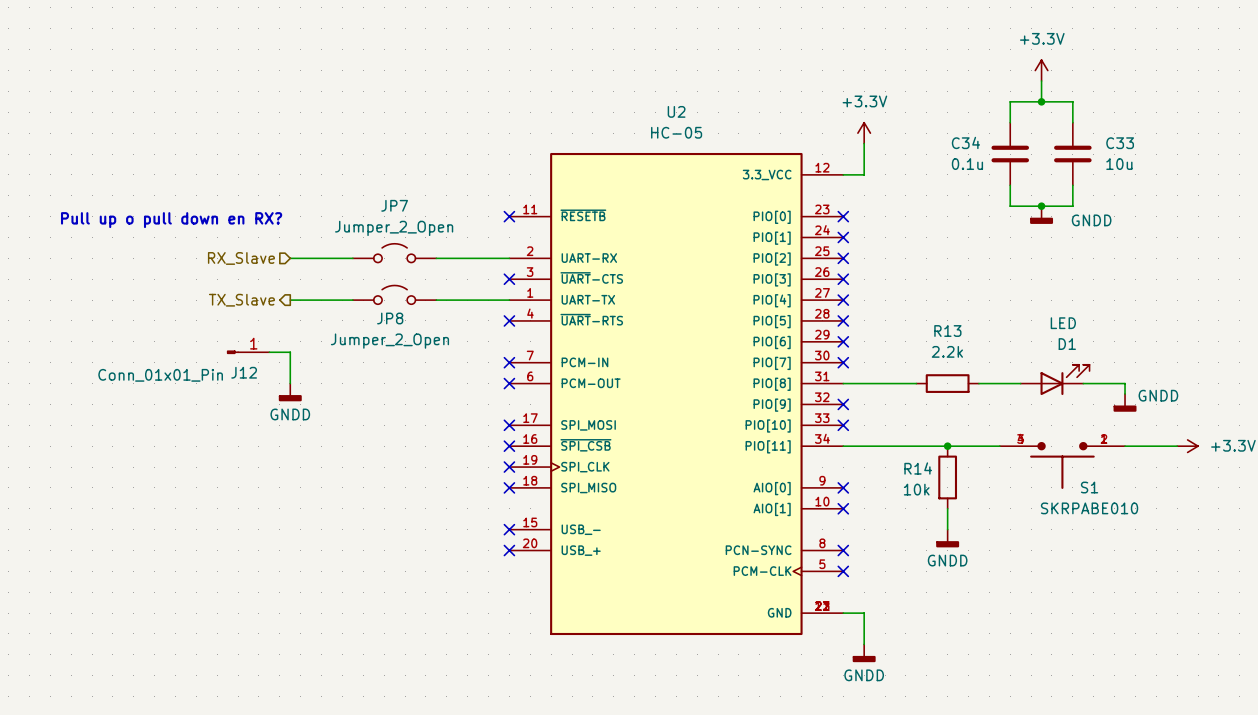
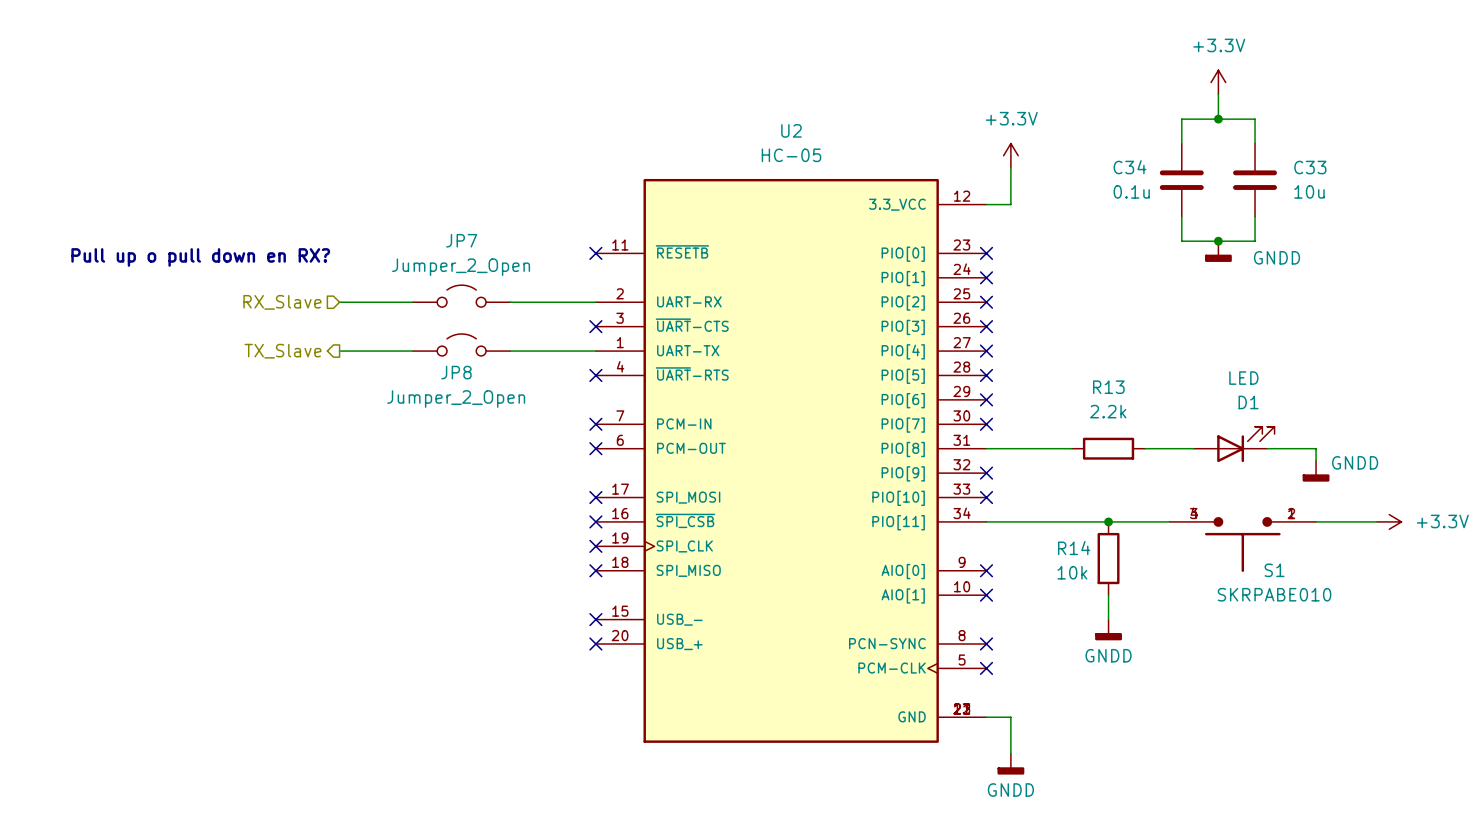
J12: Conn_01x01_Pin (248, 352) -> none
wire: (269, 352) (290, 352) (290, 383) -> none
power symbol: GNDD (290, 392) -> none

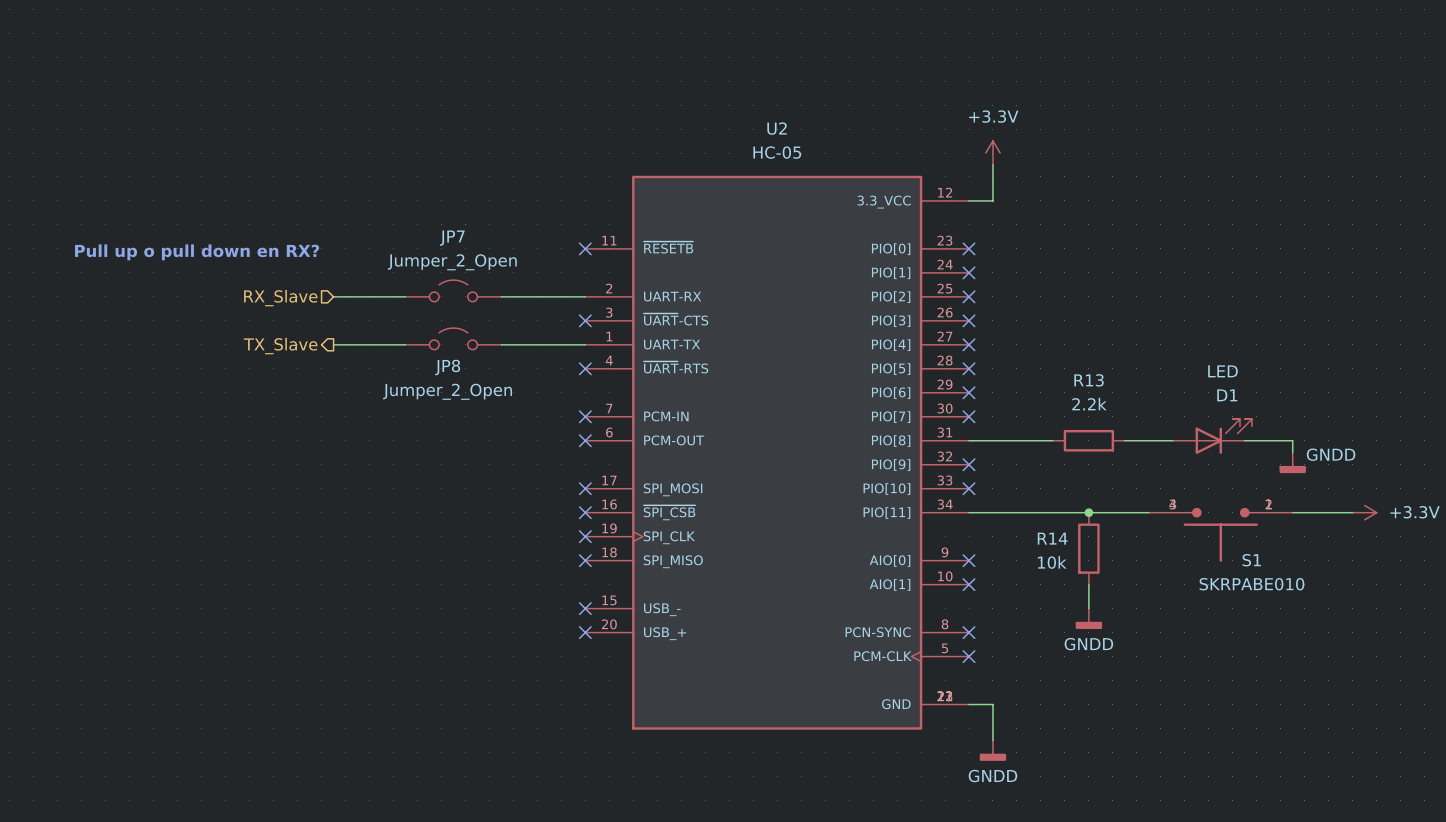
power symbol: +3.3V (1218, 82) -> none
wire: (1218, 94) (1218, 119) -> none
junction: (1218, 119) -> none
wire: (1181, 143) (1181, 119) (1255, 119) (1255, 143) -> none
C34: 0.1u (1181, 180) -> none
C33: 10u (1255, 180) -> none
wire: (1181, 216) (1181, 241) (1255, 241) (1255, 216) -> none
junction: (1218, 241) -> none
power symbol: GNDD (1218, 251) -> none

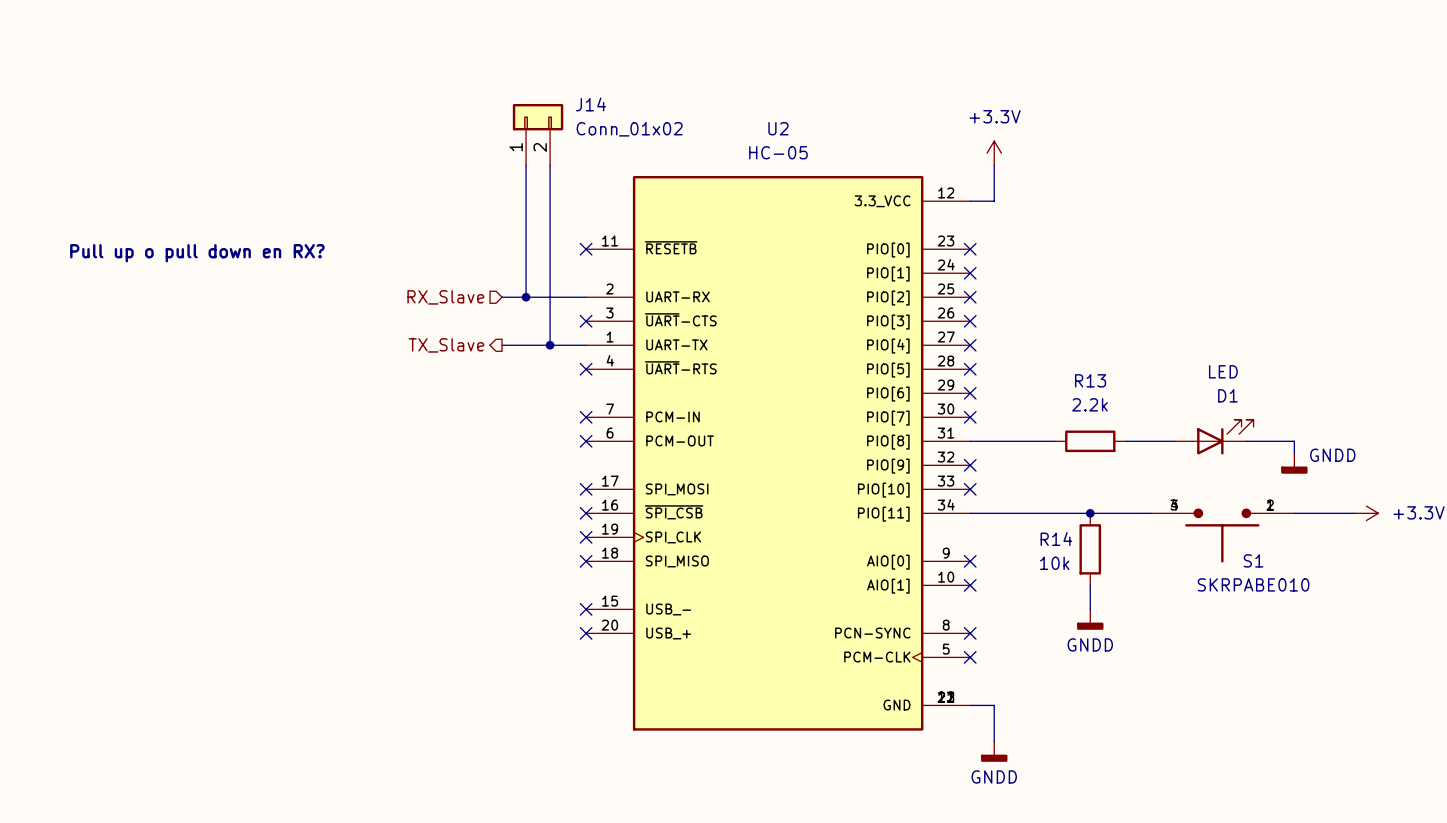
J14: none -> Conn_01x02 (538, 134)
wire: none -> (526, 165) (526, 297)
wire: none -> (550, 165) (550, 345)
JP7: Jumper_2_Open (453, 290) -> none
wire: (333, 296) (405, 296) -> none
junction: none -> (526, 297)
hierarchical label position: RX_Slave (280, 298) -> RX_Slave (445, 297)
JP8: Jumper_2_Open (453, 338) -> none
wire: (333, 344) (405, 344) -> none
junction: none -> (550, 345)
hierarchical label position: TX_Slave (280, 346) -> TX_Slave (446, 345)

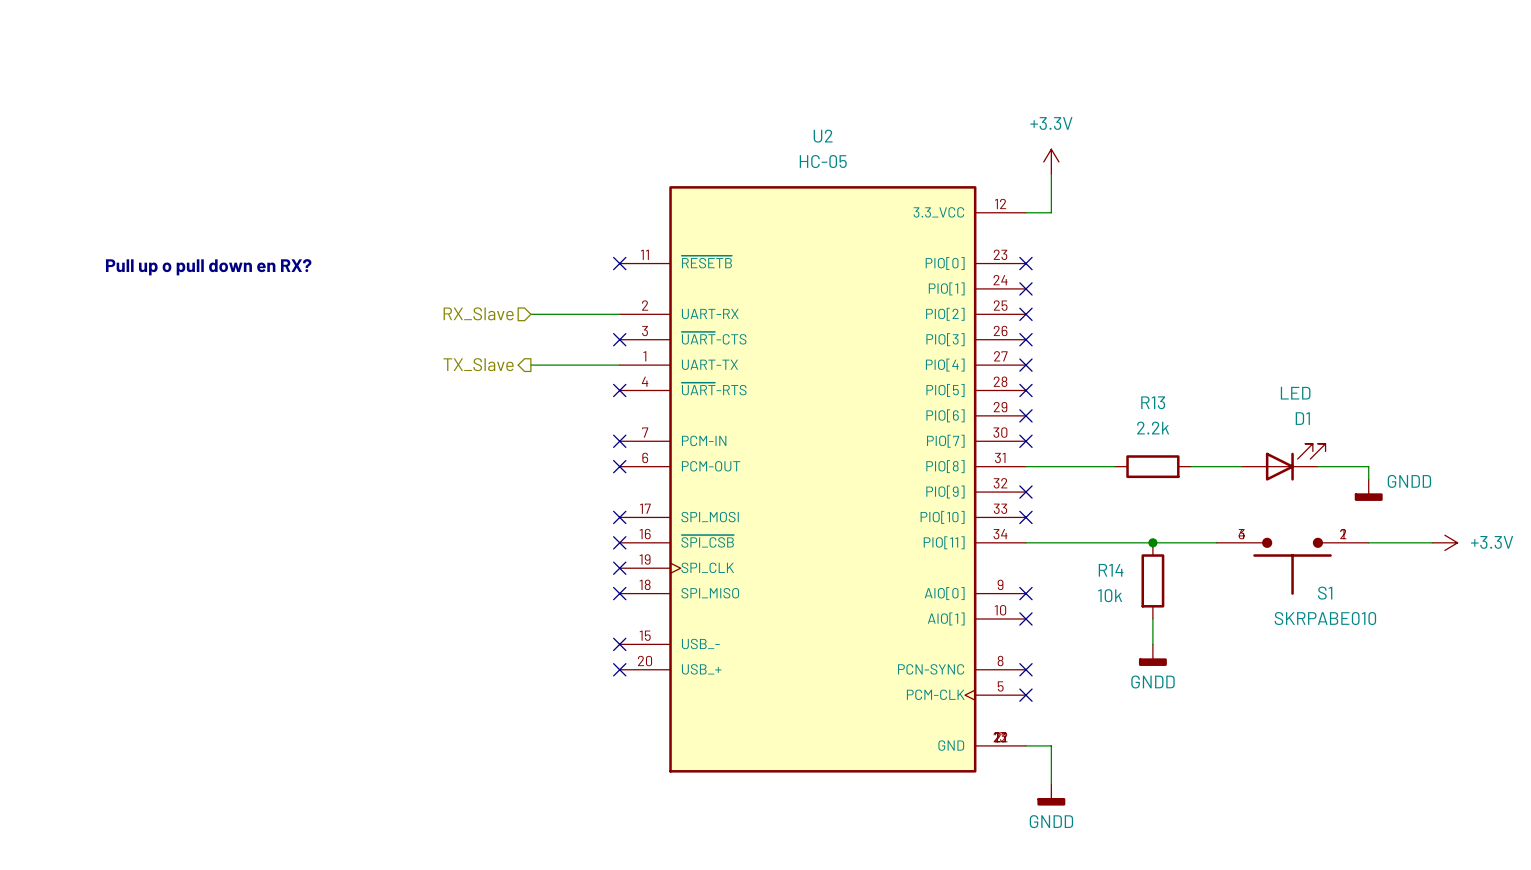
J14: Conn_01x02 (538, 134) -> none
wire: (526, 165) (526, 297) -> none
wire: (550, 165) (550, 345) -> none
junction: (526, 297) -> none
junction: (550, 345) -> none

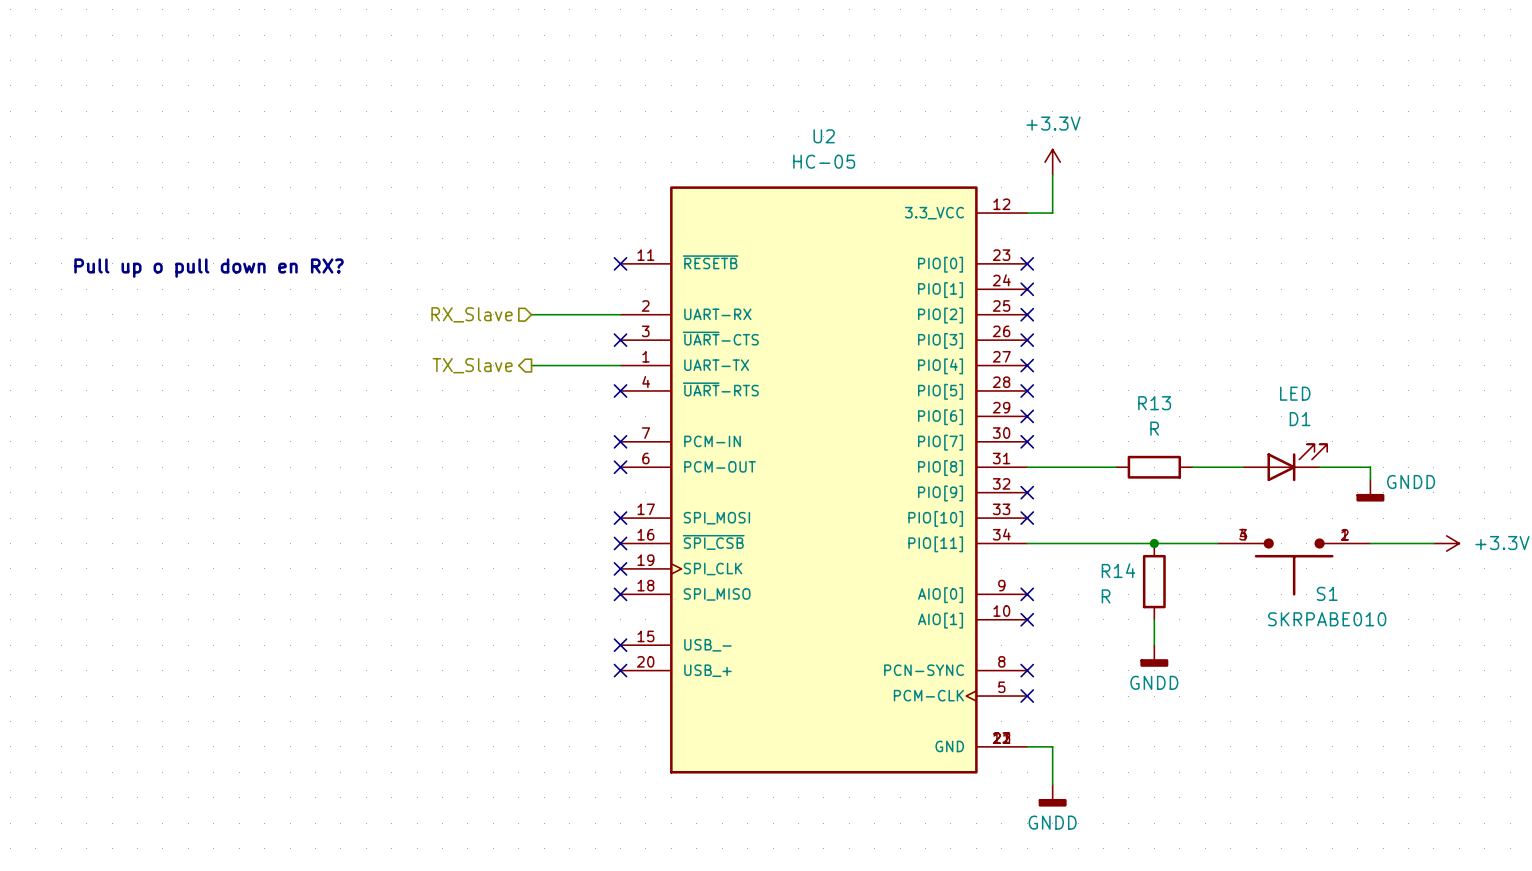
R13 value: 2.2k (1153, 428) -> R (1154, 428)
R14 value: 10k (1110, 595) -> R (1106, 596)

